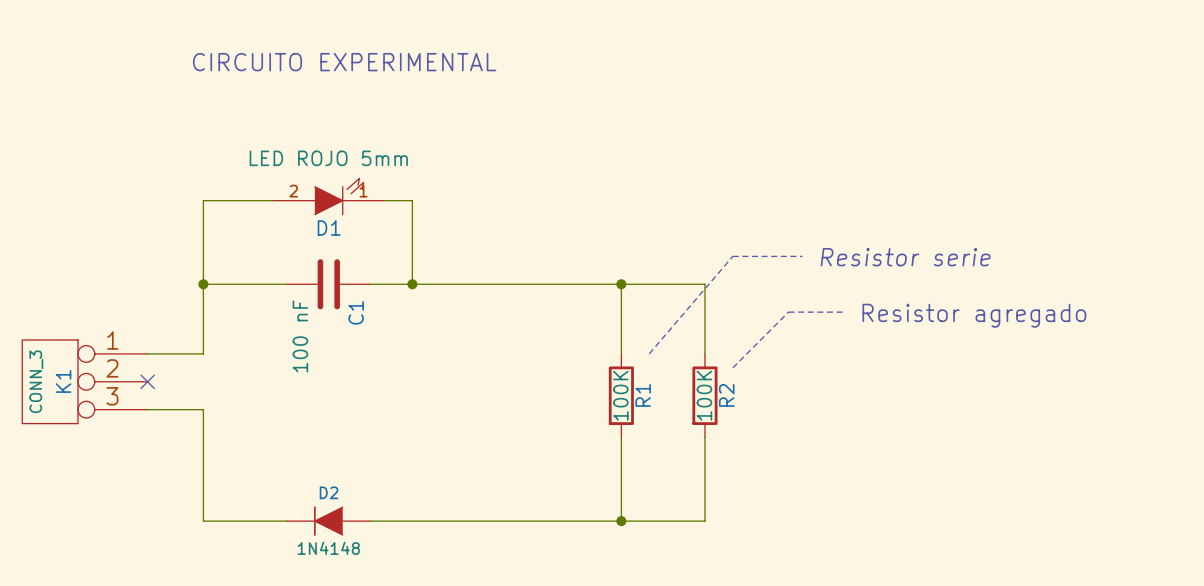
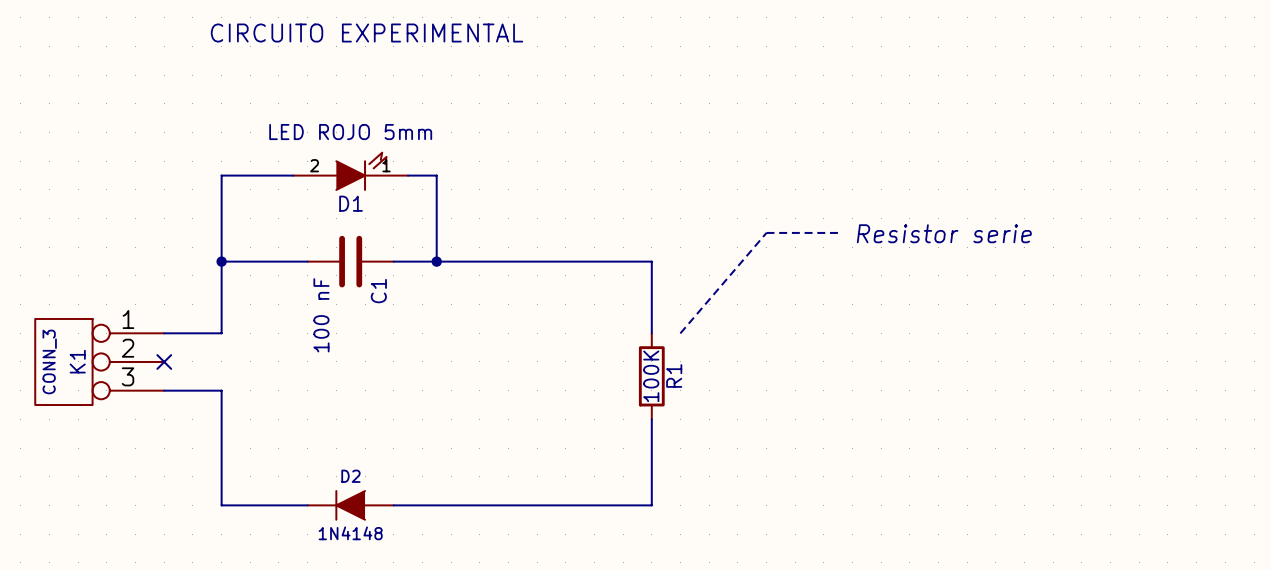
wire: (621, 284) (704, 284) (704, 353) -> none
junction: (621, 284) -> none
line: (844, 312) (788, 312) (732, 367) -> none
text: Resistor agregado (974, 315) -> none
R2: 100K (704, 395) -> none
wire: (704, 437) (704, 521) (621, 521) -> none
junction: (621, 521) -> none

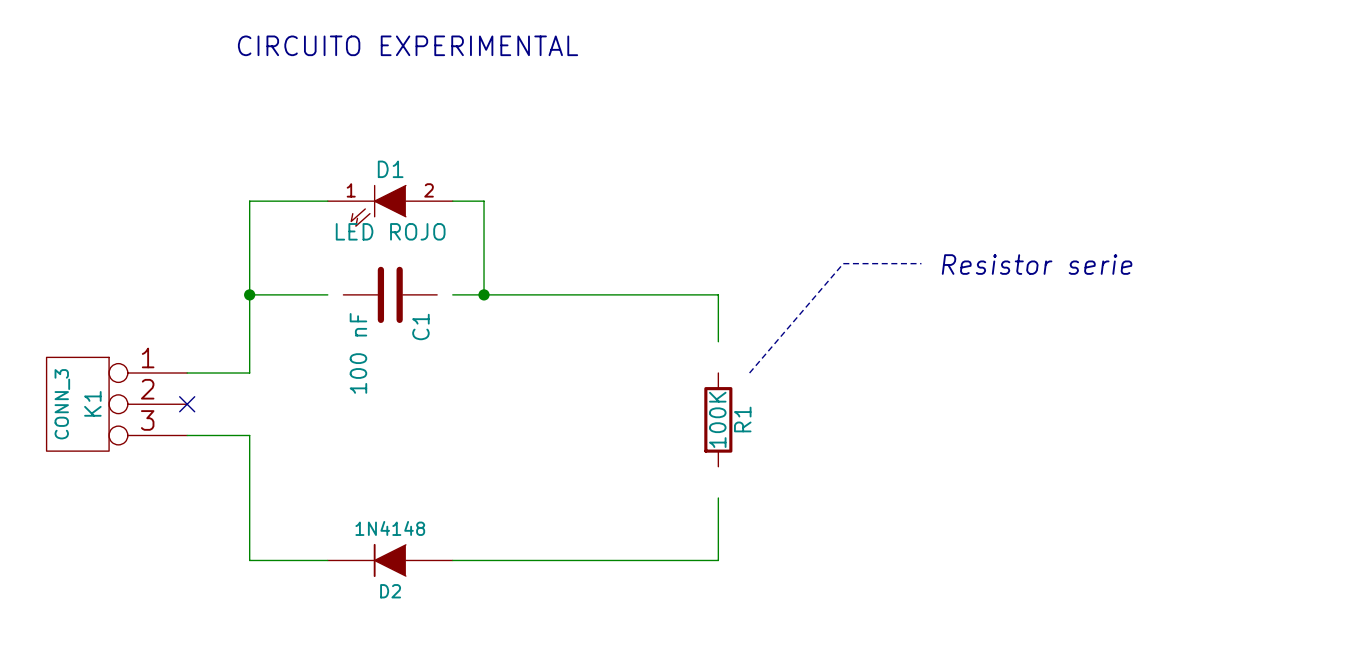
D1 value: LED ROJO 5mm (350, 132) -> LED ROJO (390, 231)
D1 rotation: 0° (361, 171) -> 180° (378, 205)
wire: (293, 261) (307, 261) -> none
wire: (393, 261) (408, 261) -> none
wire: (651, 304) (651, 333) -> none
wire: (651, 419) (651, 448) -> none
D2 name position: D2 (350, 476) -> D2 (390, 591)
D2 symbol: [307, 490, 394, 521] -> [327, 543, 453, 578]
D2 value position: 1N4148 (350, 533) -> 1N4148 (390, 528)

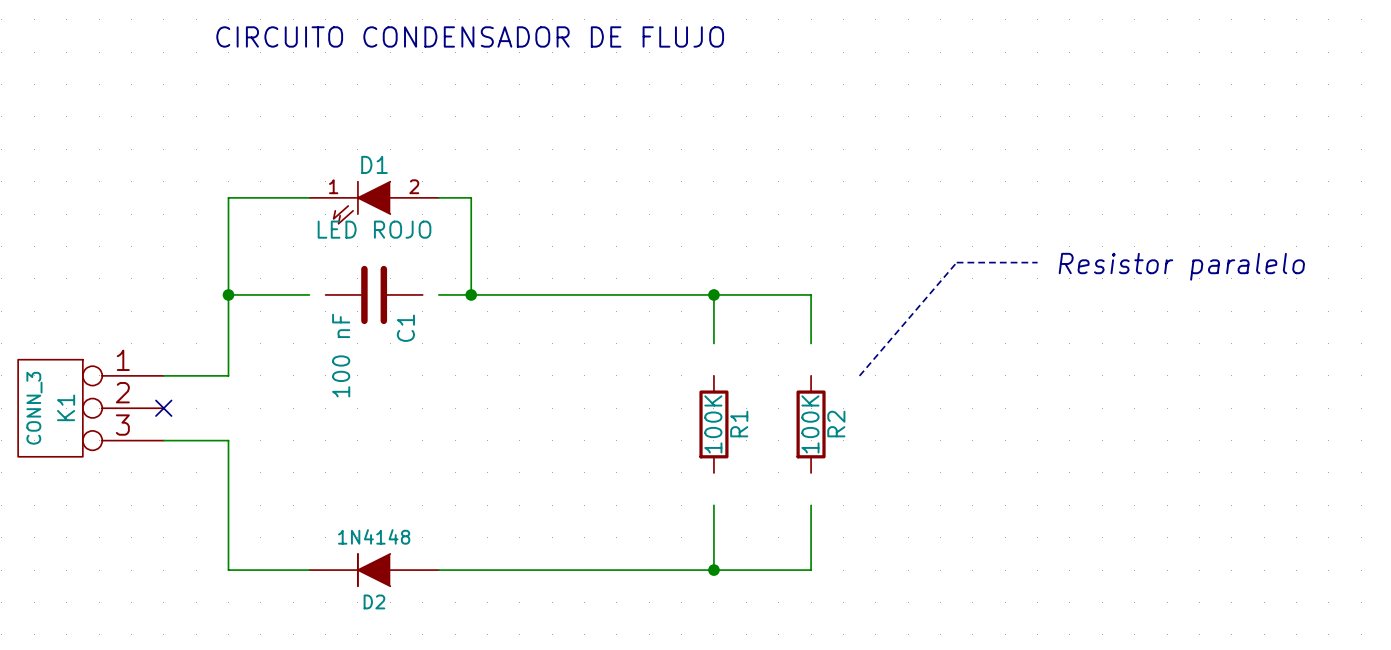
text: CIRCUITO EXPERIMENTAL (408, 45) -> CIRCUITO CONDENSADOR DE FLUJO (470, 36)
line: (921, 263) (843, 263) (749, 373) -> (1037, 262) (956, 262) (859, 375)
text: Resistor serie (1037, 264) -> Resistor paralelo (1181, 266)
wire: none -> (713, 294) (811, 294) (811, 343)
junction: none -> (713, 294)
R2: none -> 100K (811, 424)
wire: none -> (811, 505) (811, 570) (713, 570)
junction: none -> (713, 570)

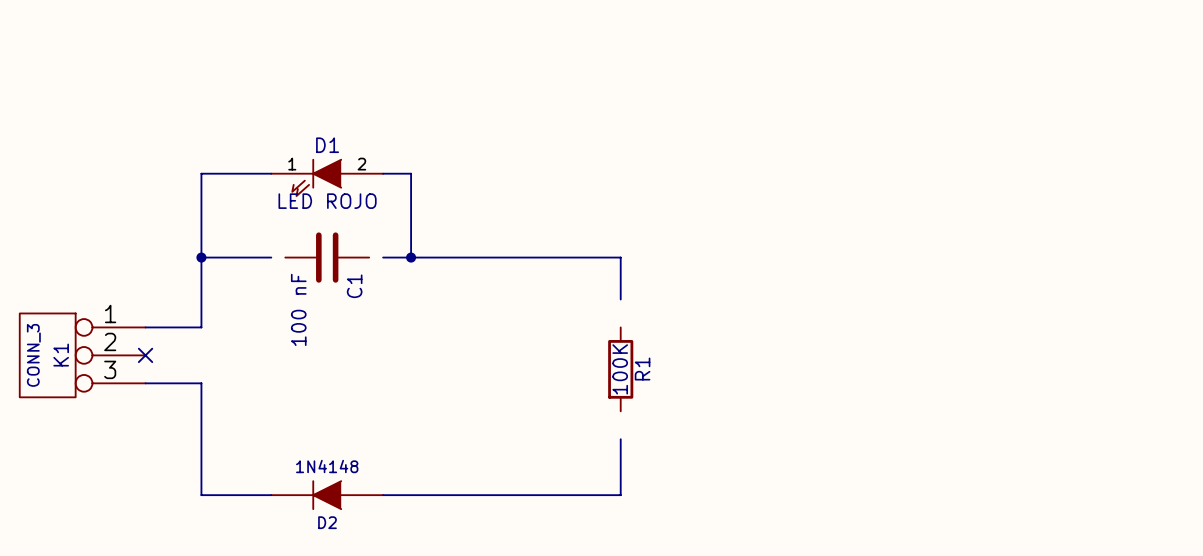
text: CIRCUITO CONDENSADOR DE FLUJO (470, 36) -> none
line: (1037, 262) (956, 262) (859, 375) -> none
text: Resistor paralelo (1181, 266) -> none
wire: (713, 294) (811, 294) (811, 343) -> none
junction: (713, 294) -> none
R2: 100K (811, 424) -> none
wire: (811, 505) (811, 570) (713, 570) -> none
junction: (713, 570) -> none

